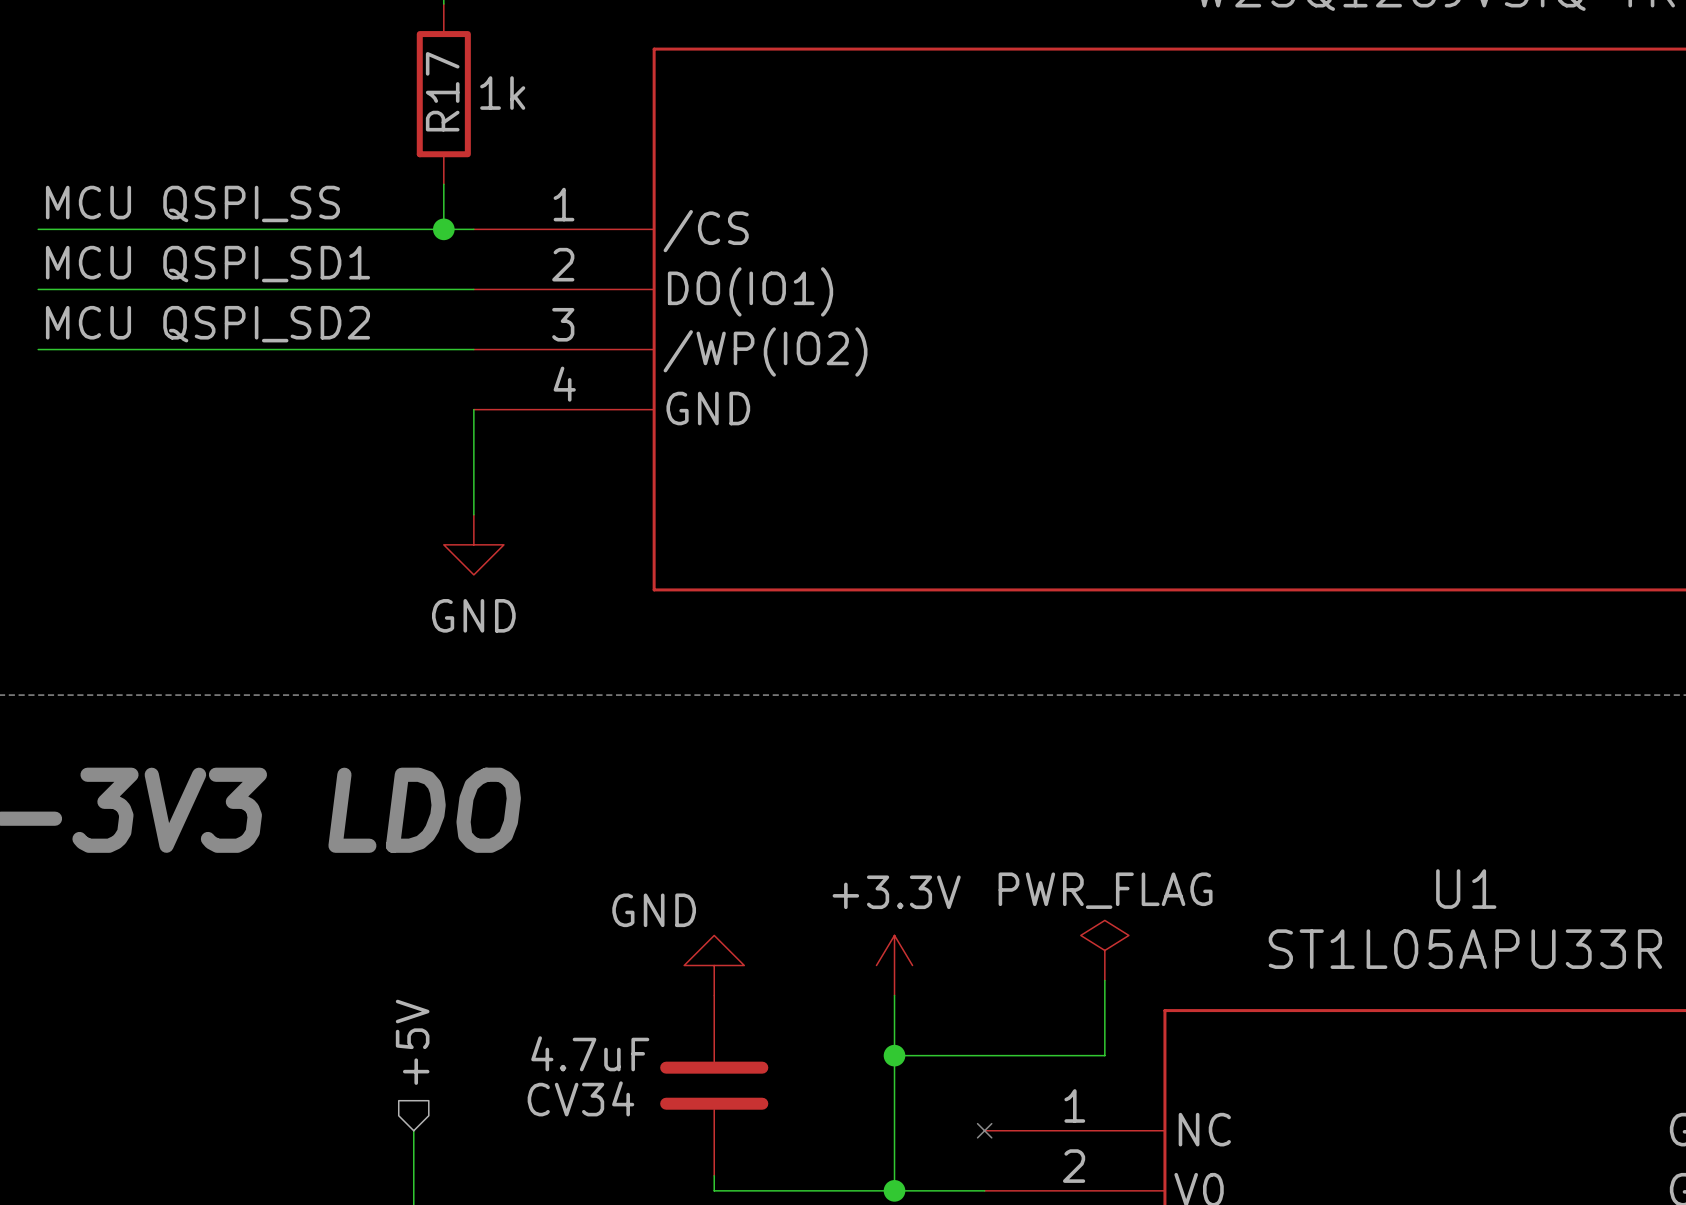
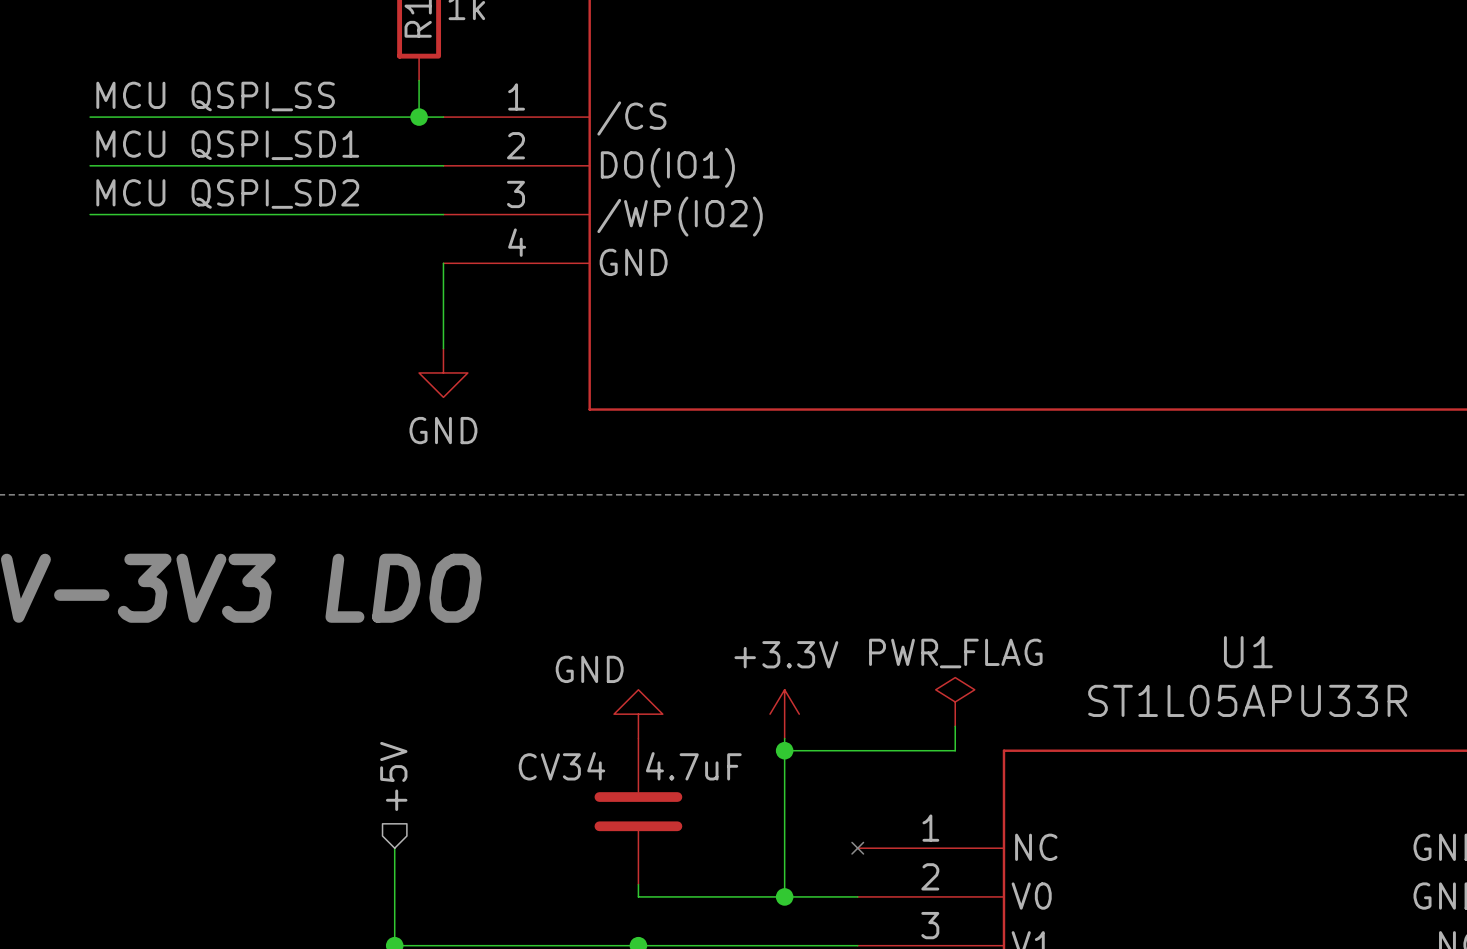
wire: (1104, 1010) (1104, 1055) (894, 1055) -> (955, 750) (784, 750)
CV34 value position: 4.7uF (590, 1053) -> 4.7uF (693, 766)
junction position: (894, 1055) -> (784, 750)
CV34 name position: CV34 (580, 1098) -> CV34 (561, 766)

